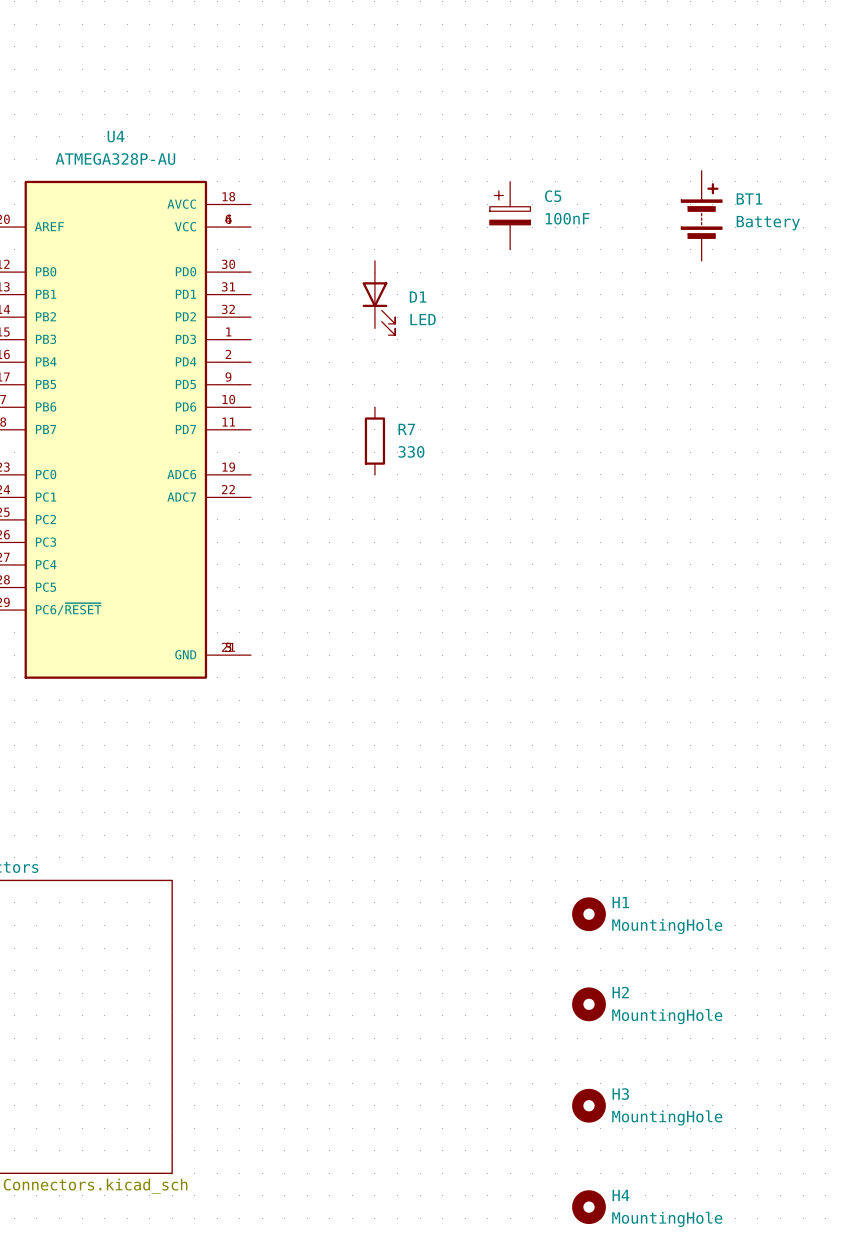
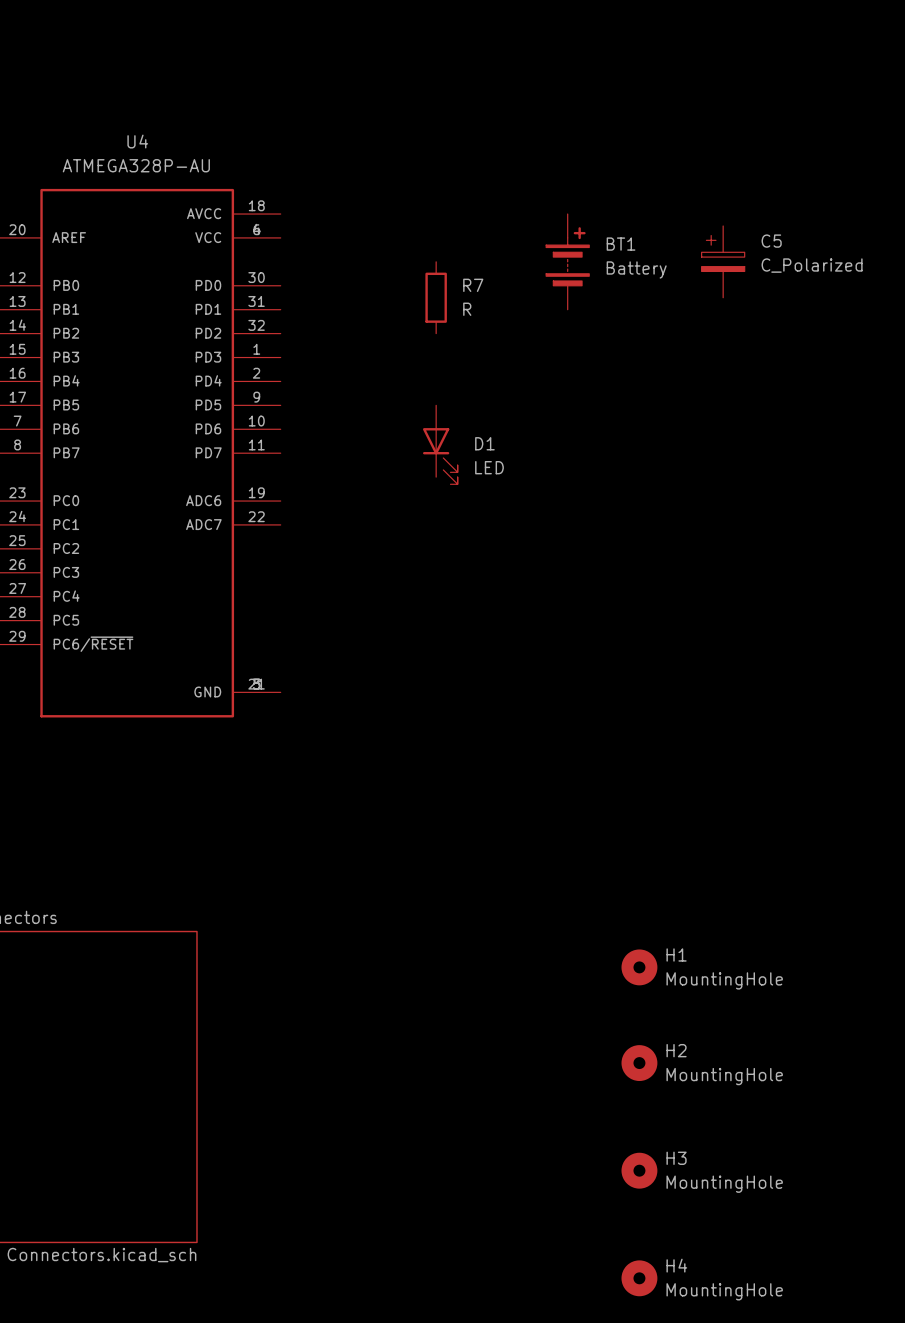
C5 position: (510, 215) -> (723, 261)
BT1 position: (701, 215) -> (567, 261)
C5 value: 100nF (567, 218) -> C_Polarized (812, 265)
D1 position: (378, 298) -> (440, 444)
R7 position: (374, 441) -> (436, 297)
R7 value: 330 (411, 451) -> R (467, 309)

